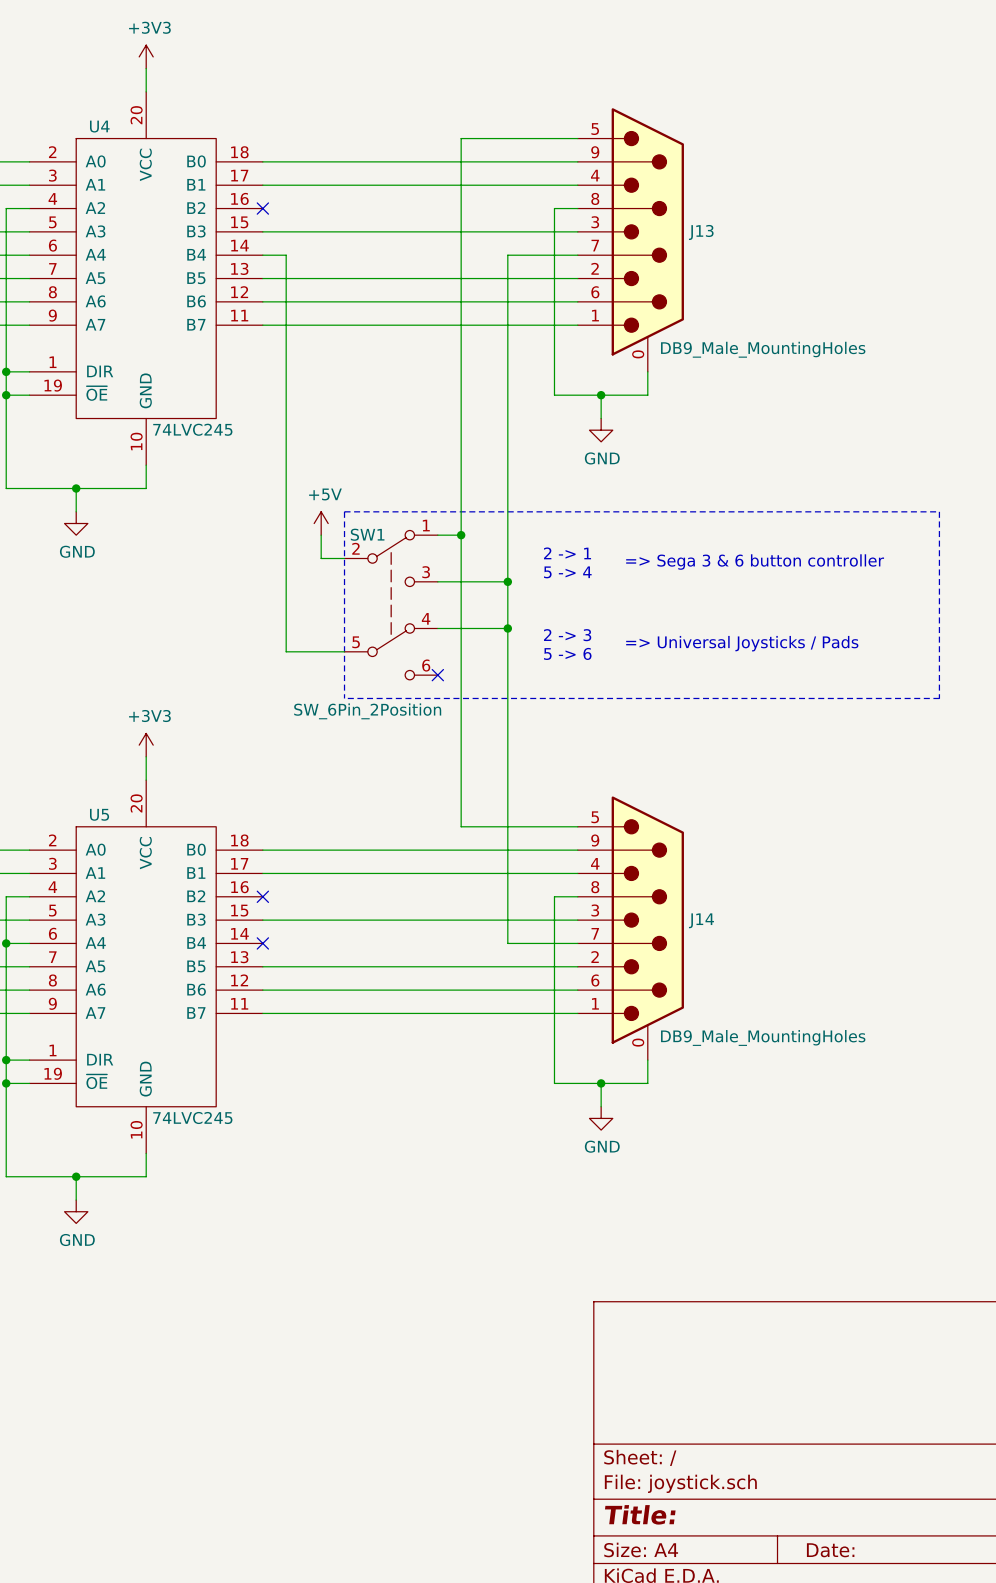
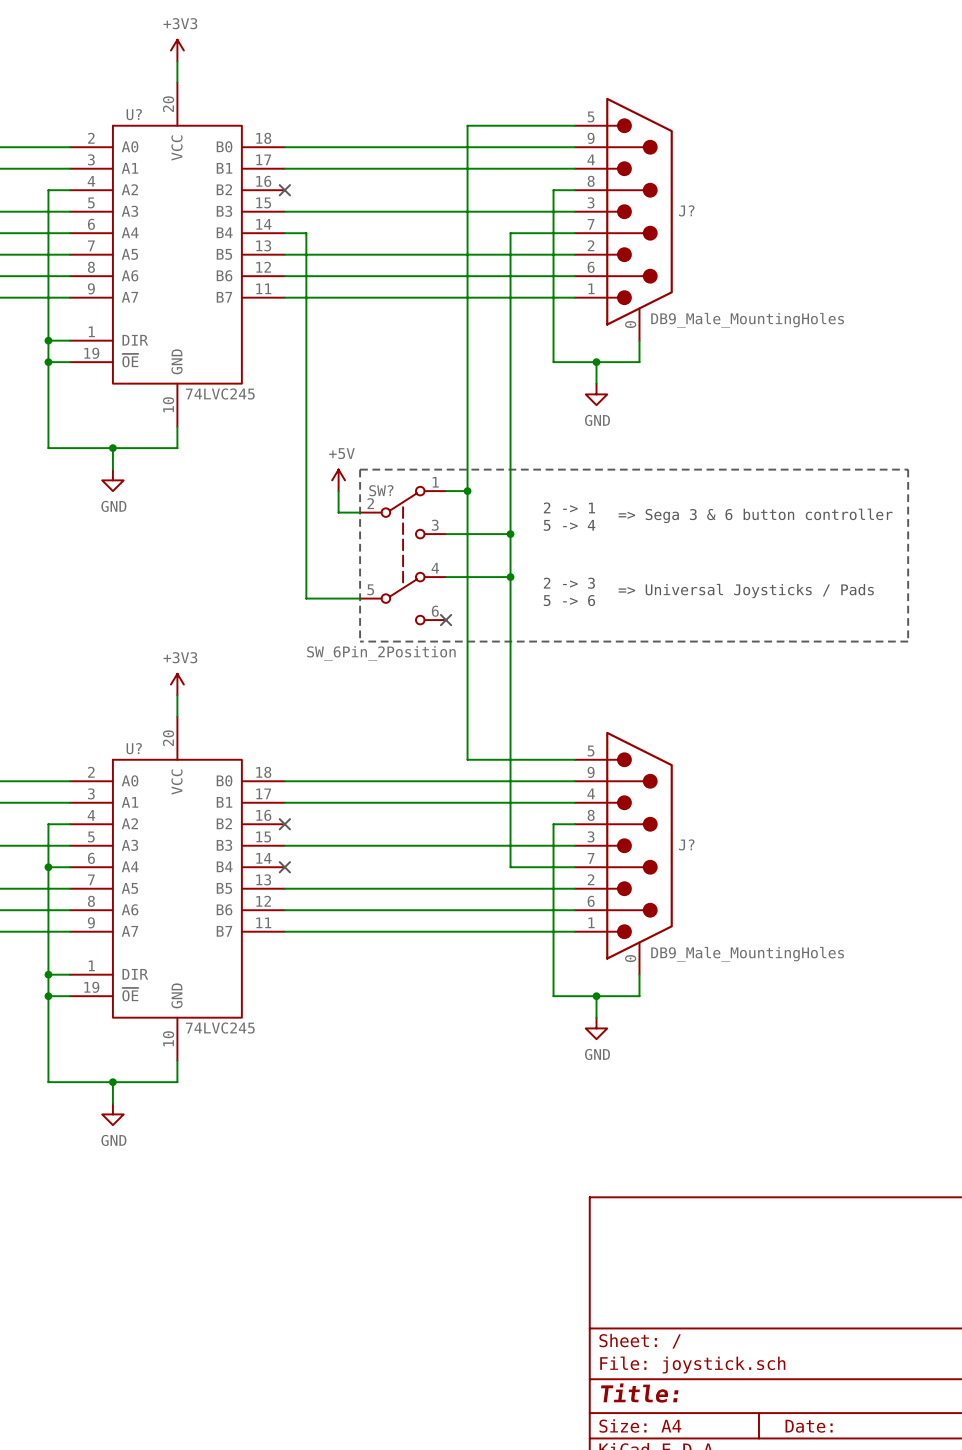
U4 name: U4 (99, 126) -> U? (134, 114)
J13 name: J13 (701, 232) -> J? (686, 210)
SW1 name: SW1 (367, 534) -> SW? (381, 490)
U5 name: U5 (99, 814) -> U? (134, 748)
J14 name: J14 (701, 920) -> J? (686, 844)

